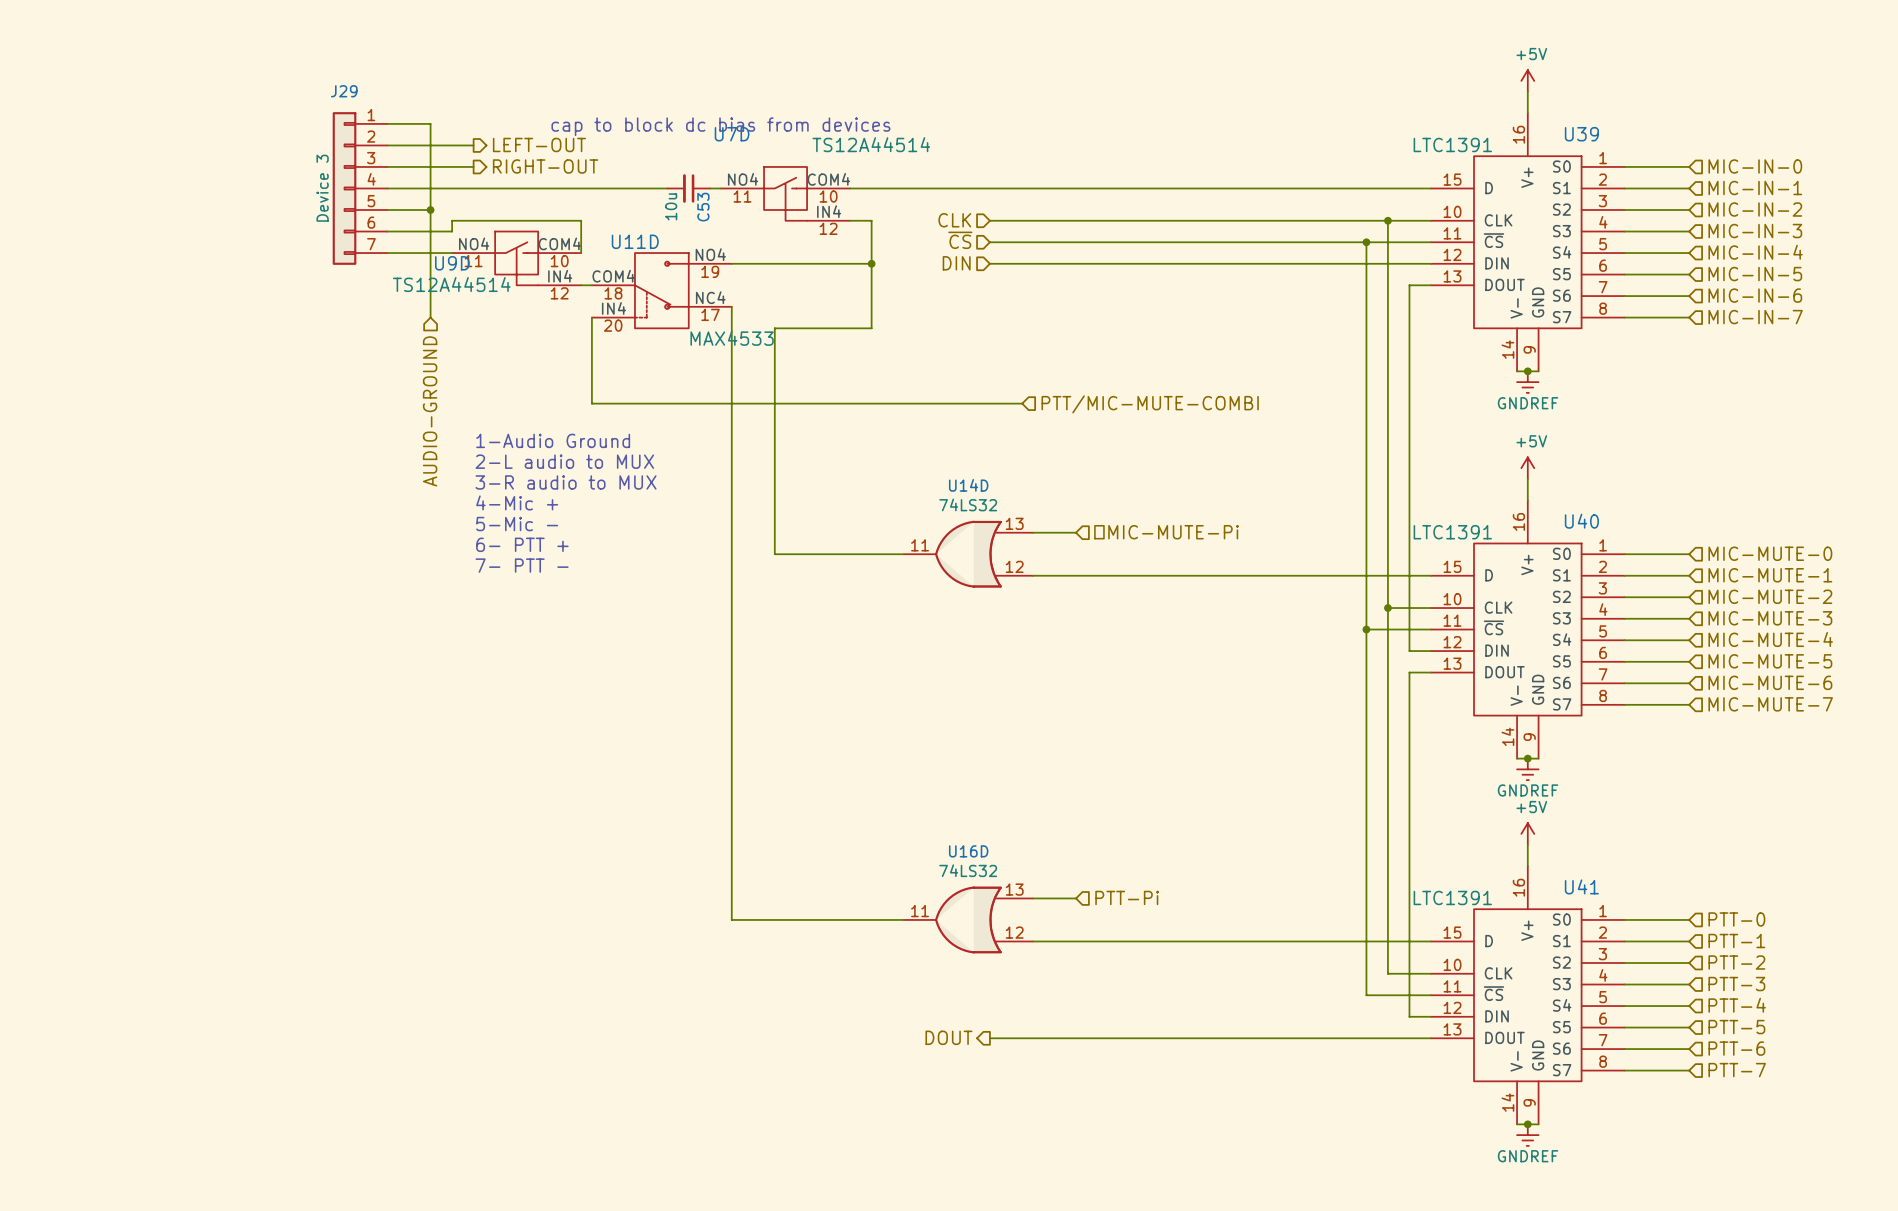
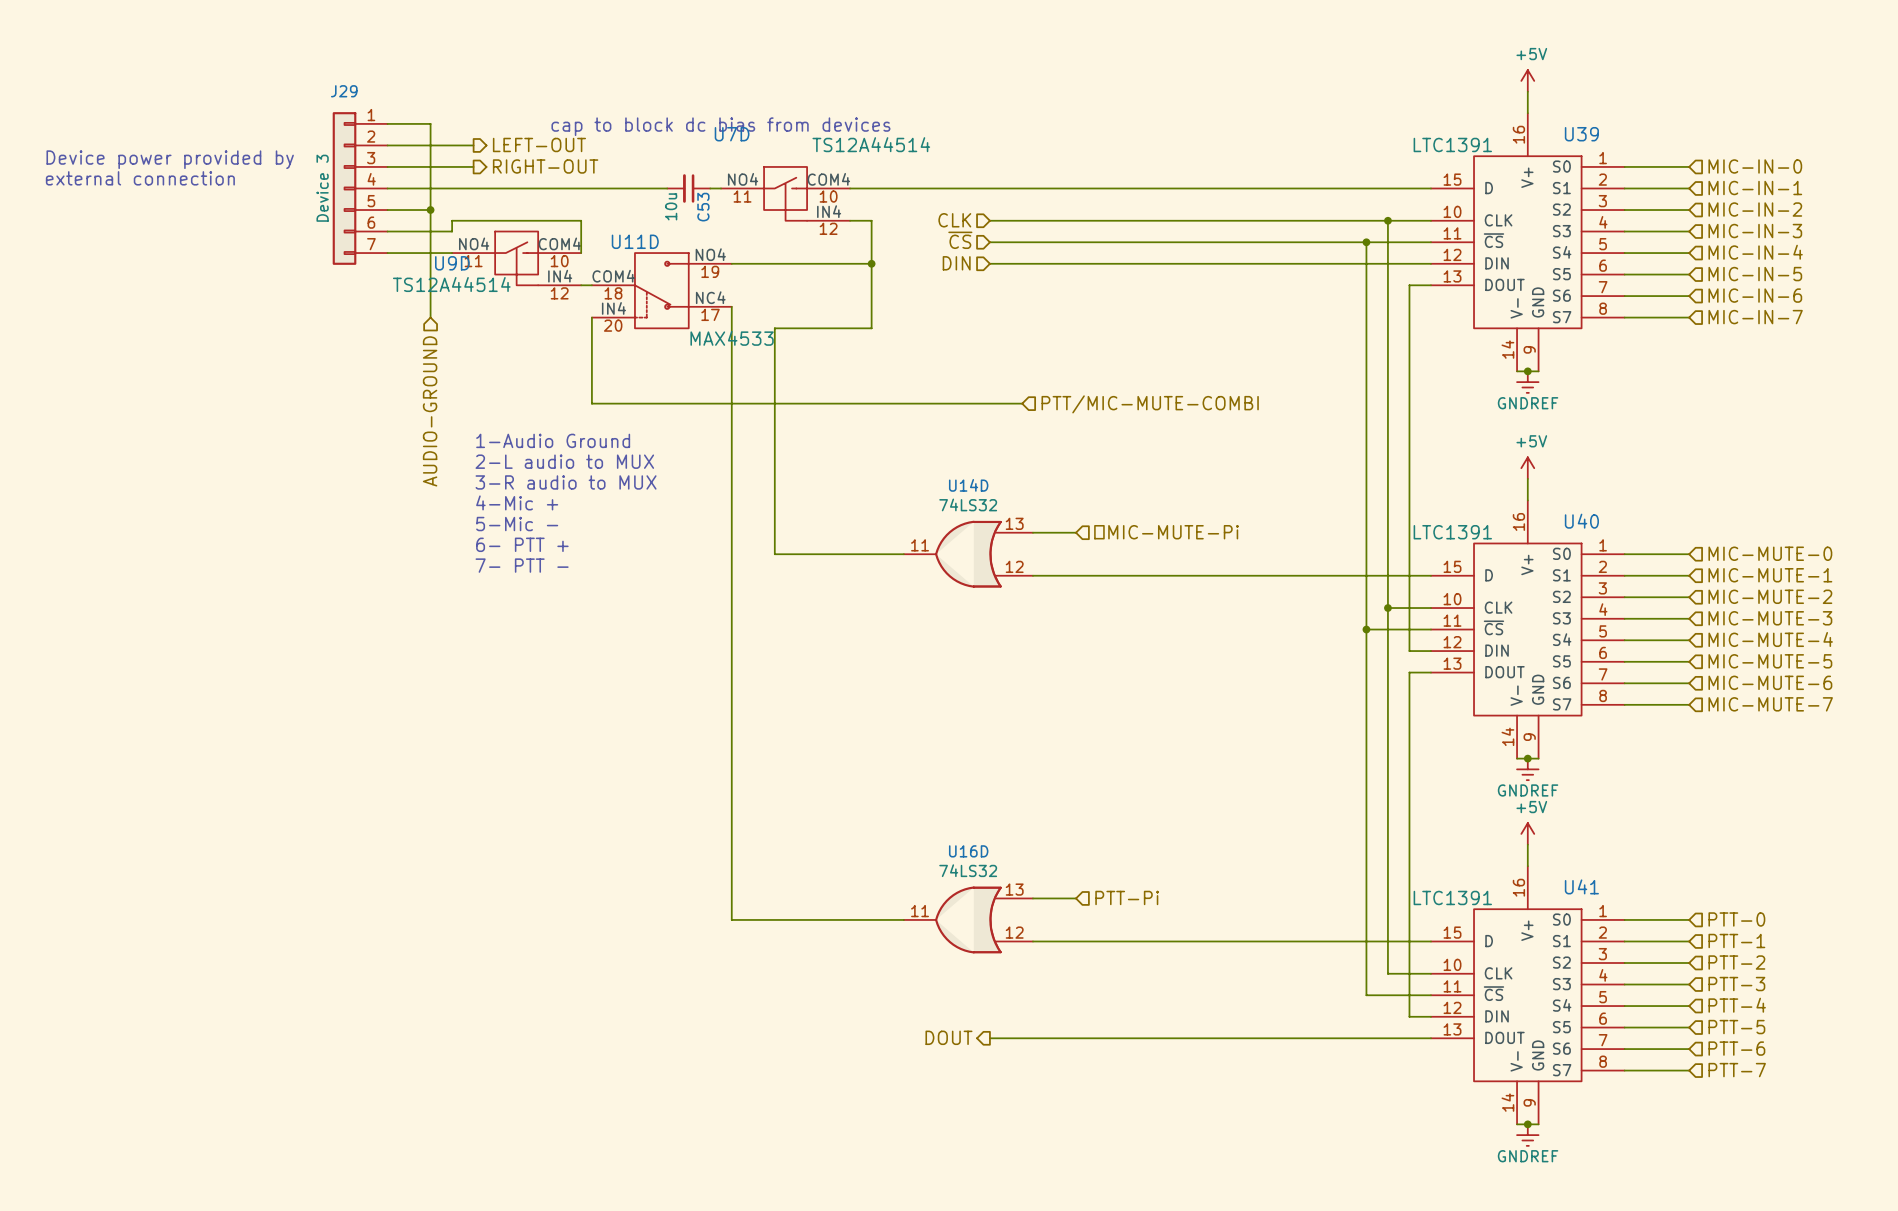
text: none -> Device power provided by (170, 159)
text: none -> external connection (140, 178)

